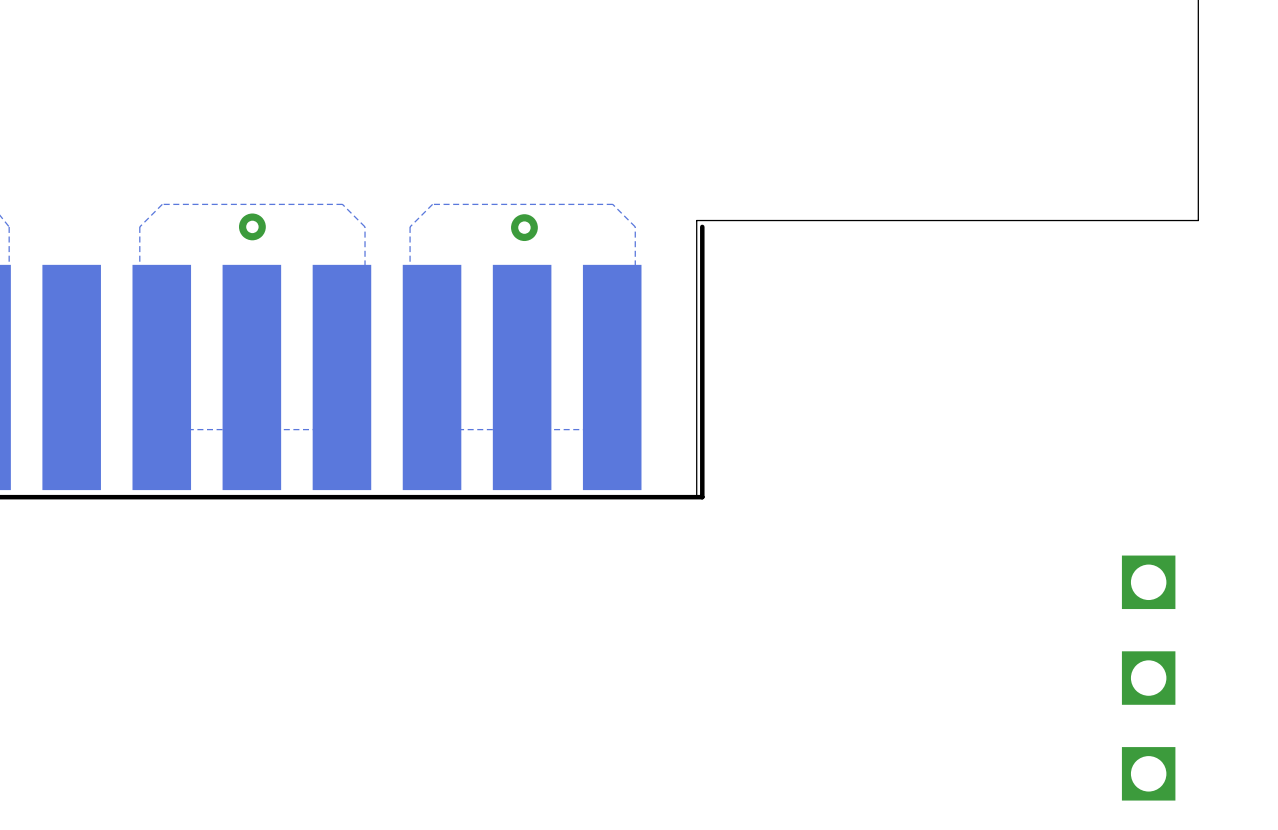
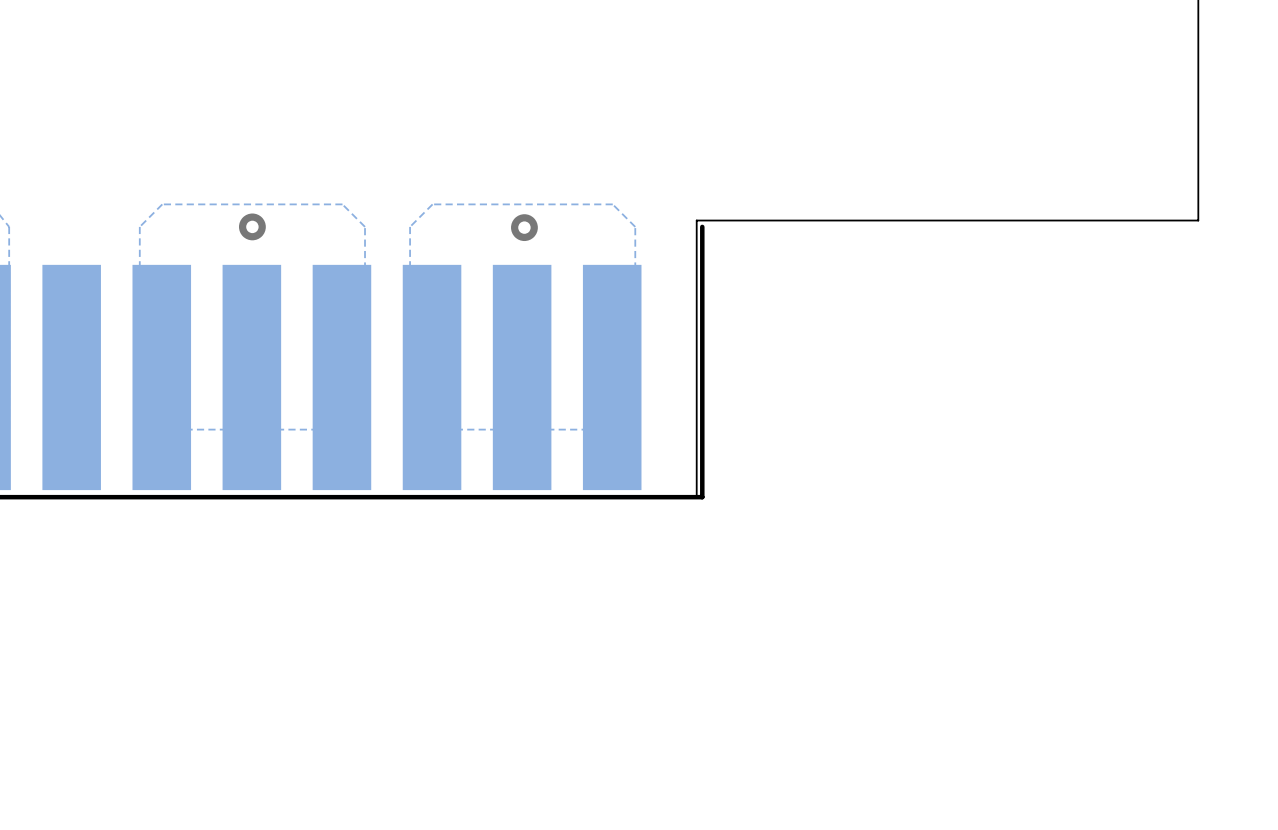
part: (1148, 582) -> none
part: (1148, 678) -> none
part: (1148, 773) -> none

